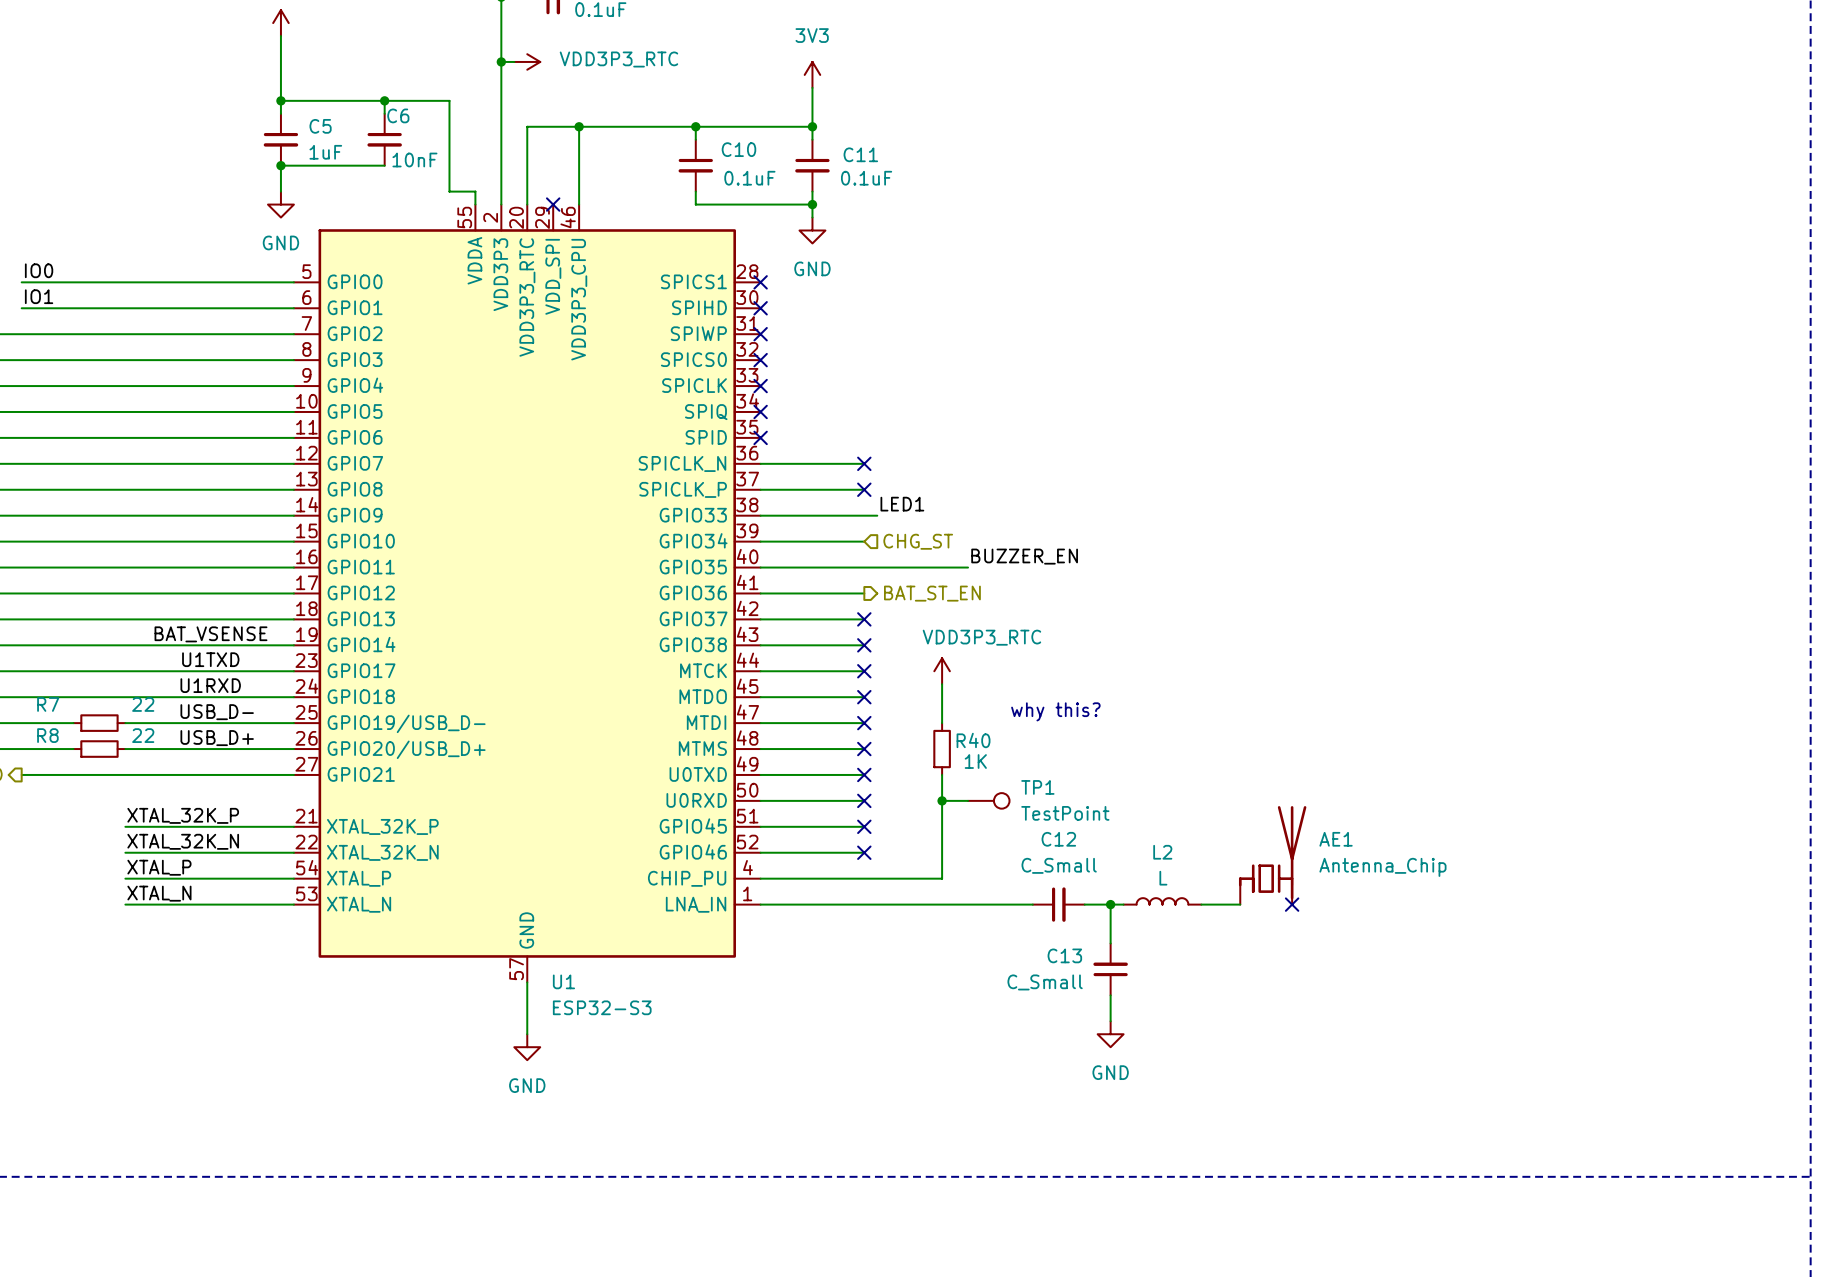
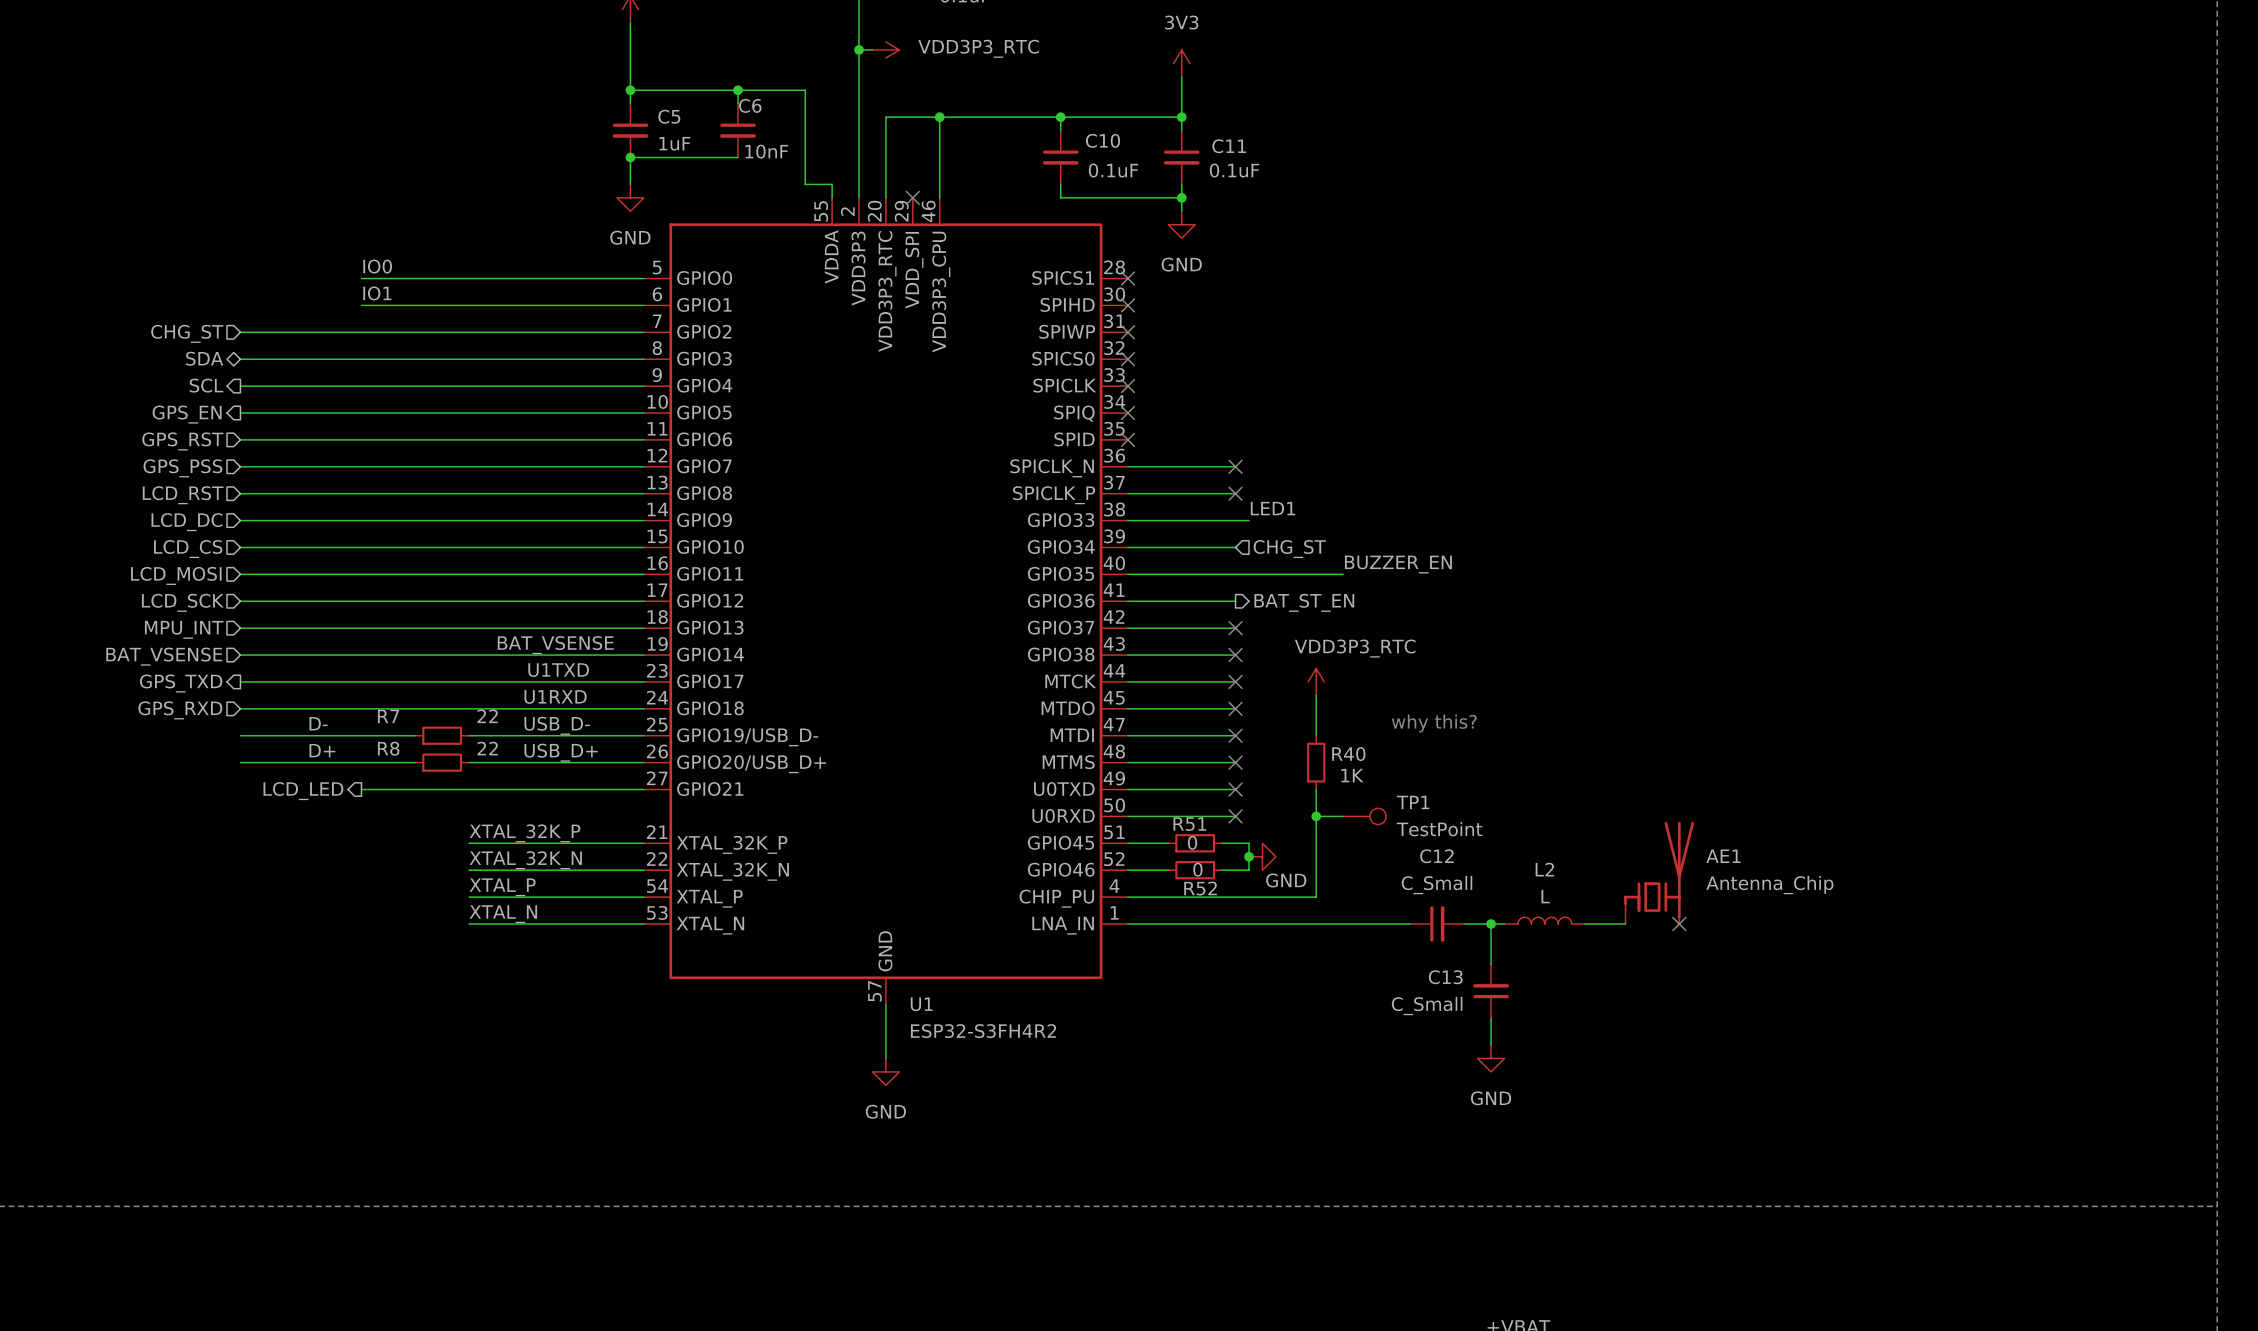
wire: (799, 826) (851, 826) -> none
R51: none -> 0 (1195, 843)
wire: none -> (1235, 843) (1249, 843) (1249, 870) (1235, 870)
no-connect mark: (864, 826) -> none
junction: none -> (1249, 856)
power symbol: none -> GND (1262, 856)
wire: (799, 852) (851, 852) -> none
R52: none -> 0 (1195, 870)
no-connect mark: (864, 852) -> none
U1 value: ESP32-S3 (602, 1007) -> ESP32-S3FH4R2 (983, 1031)

